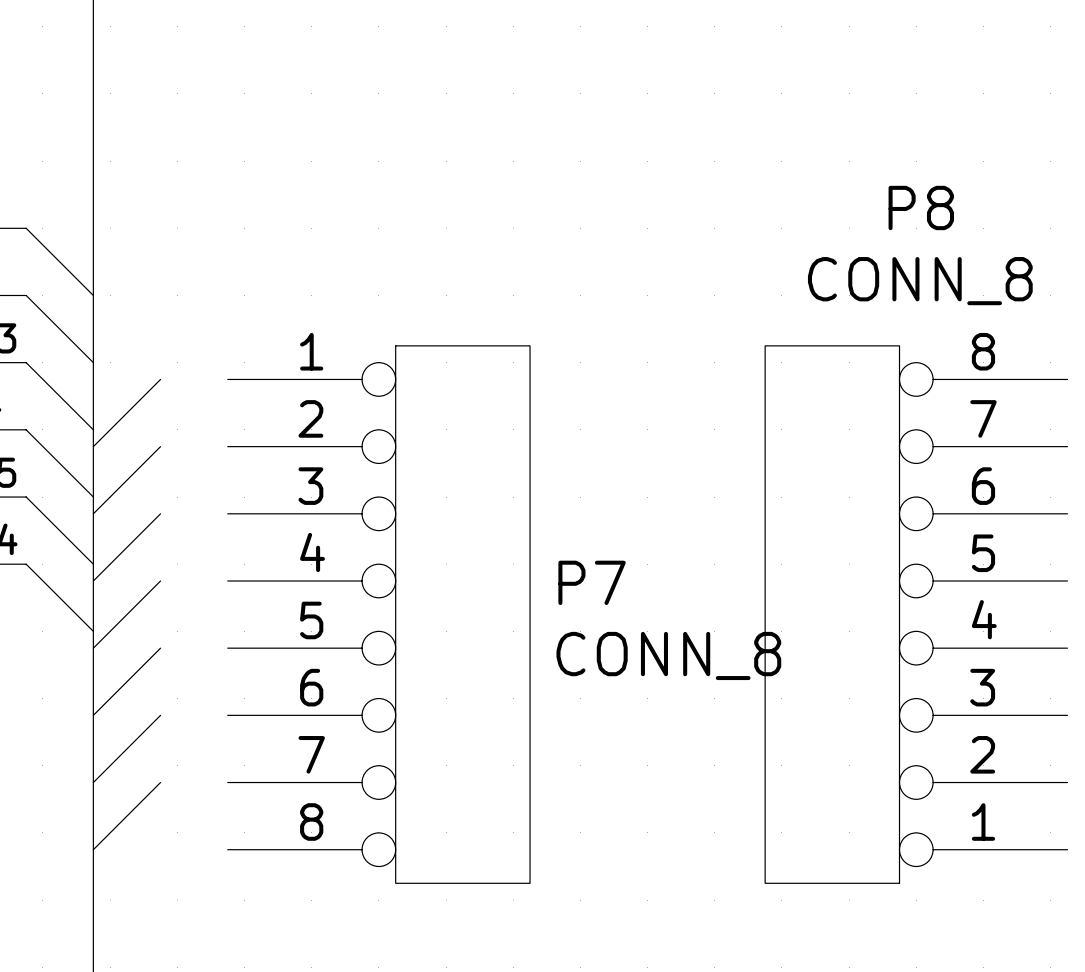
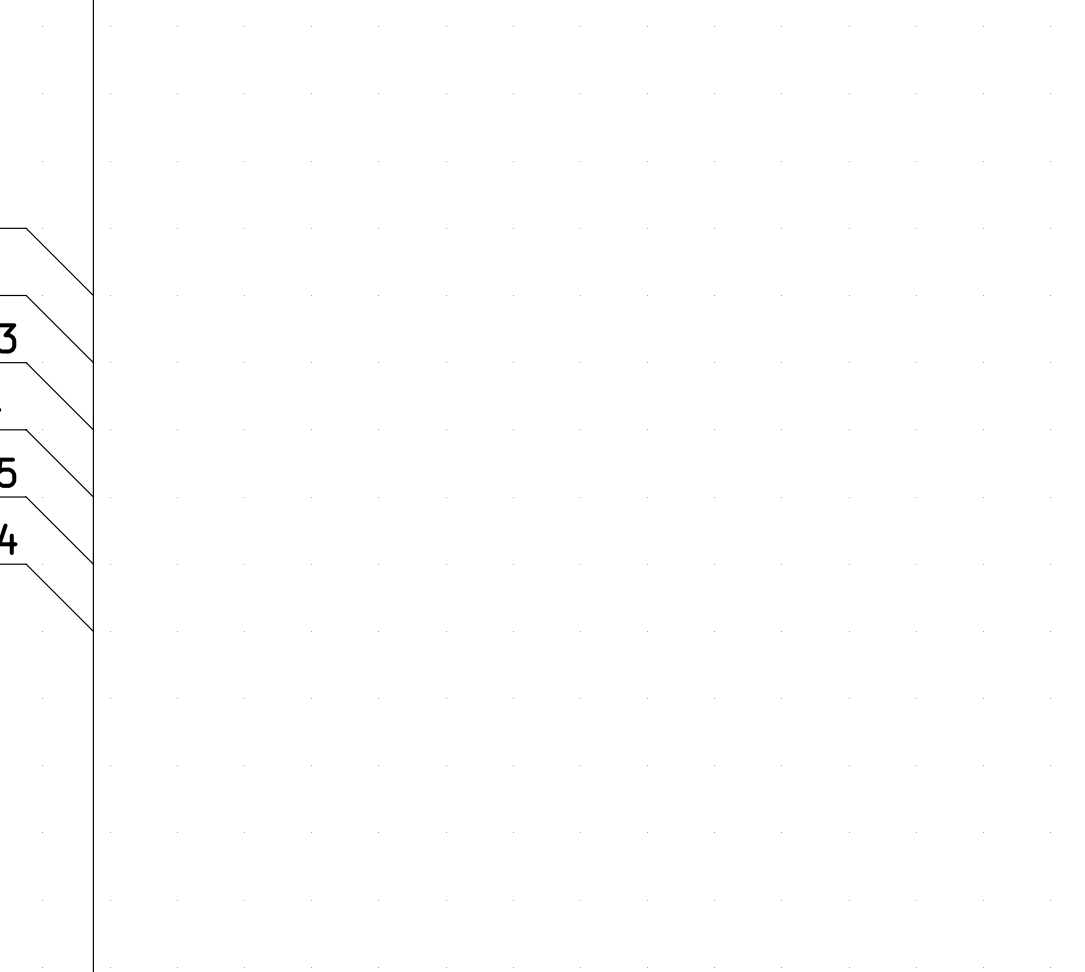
wire: (160, 379) (93, 446) -> none
wire: (160, 446) (93, 513) -> none
wire: (160, 513) (93, 580) -> none
wire: (160, 580) (93, 648) -> none
P7: CONN_8 (378, 614) -> none
P8: CONN_8 (916, 614) -> none
wire: (160, 648) (93, 715) -> none
wire: (160, 715) (93, 782) -> none
wire: (160, 782) (93, 849) -> none

